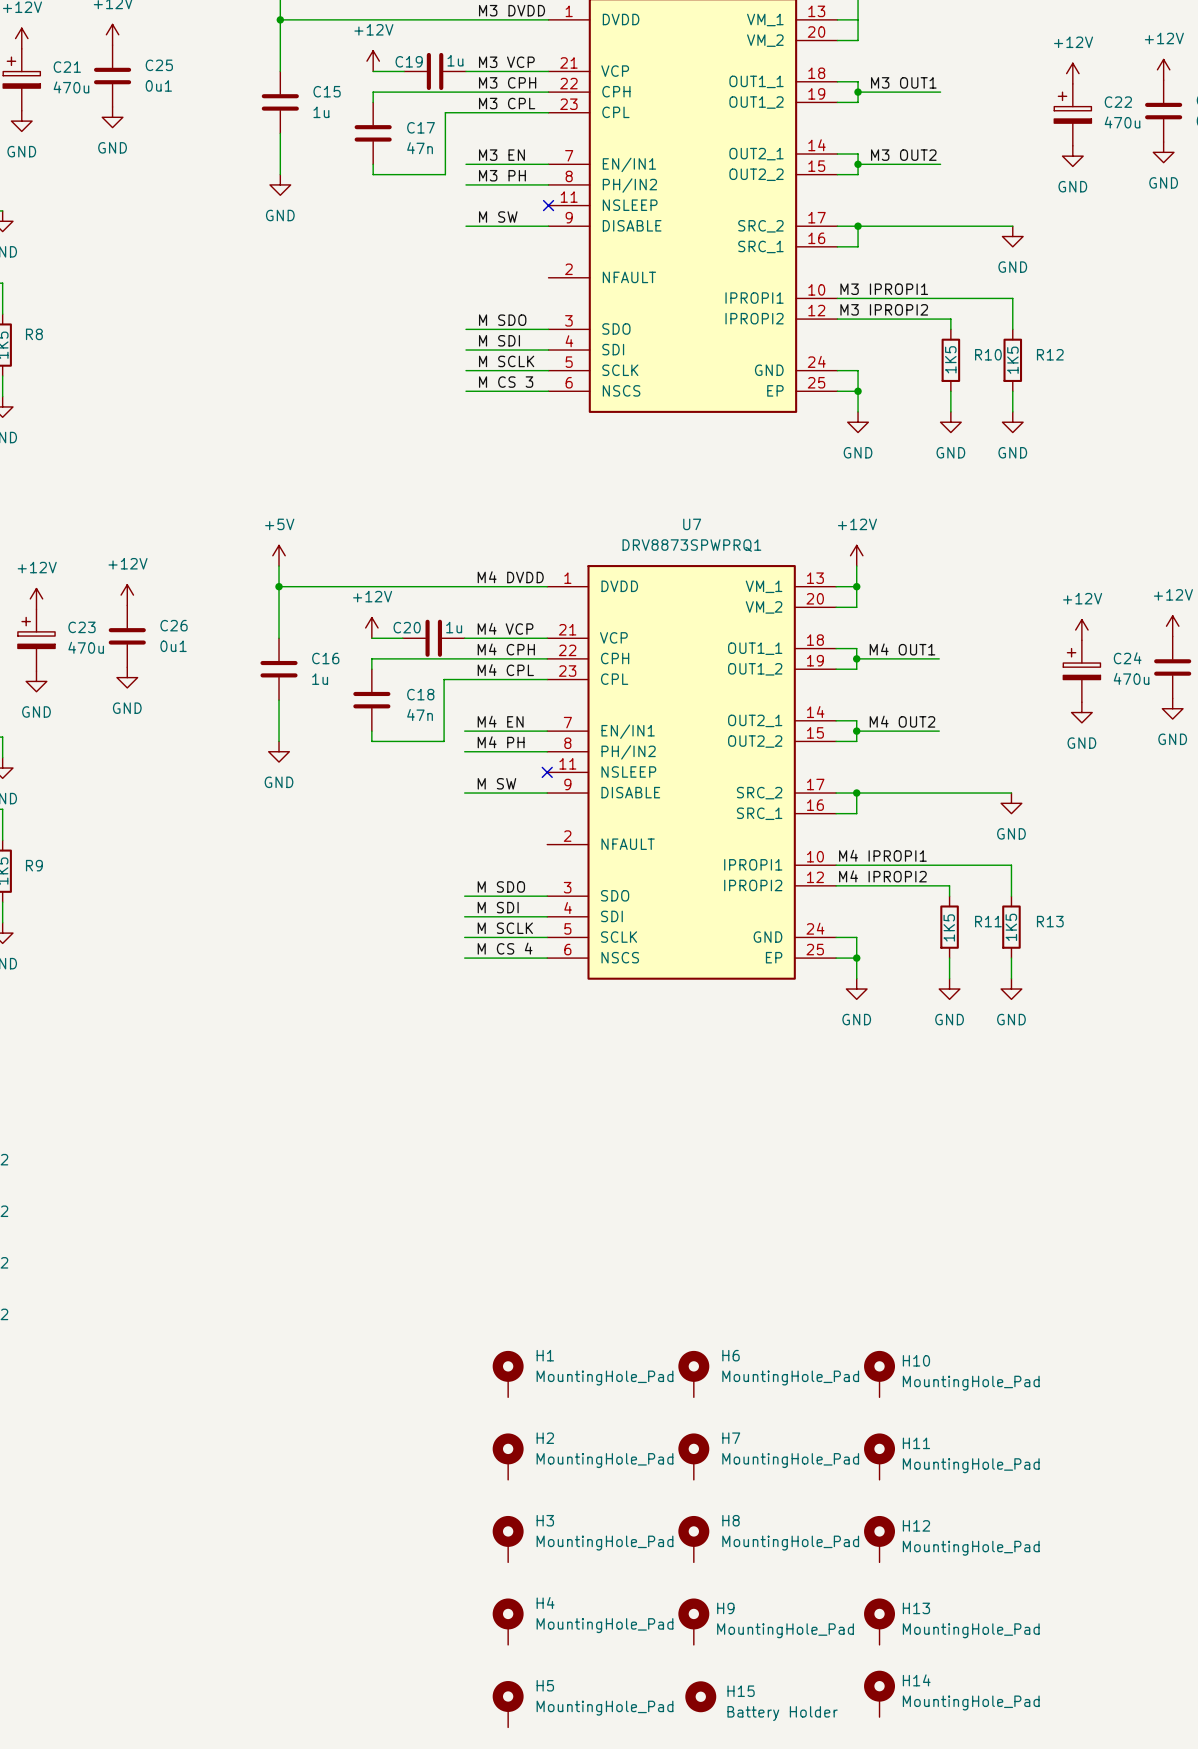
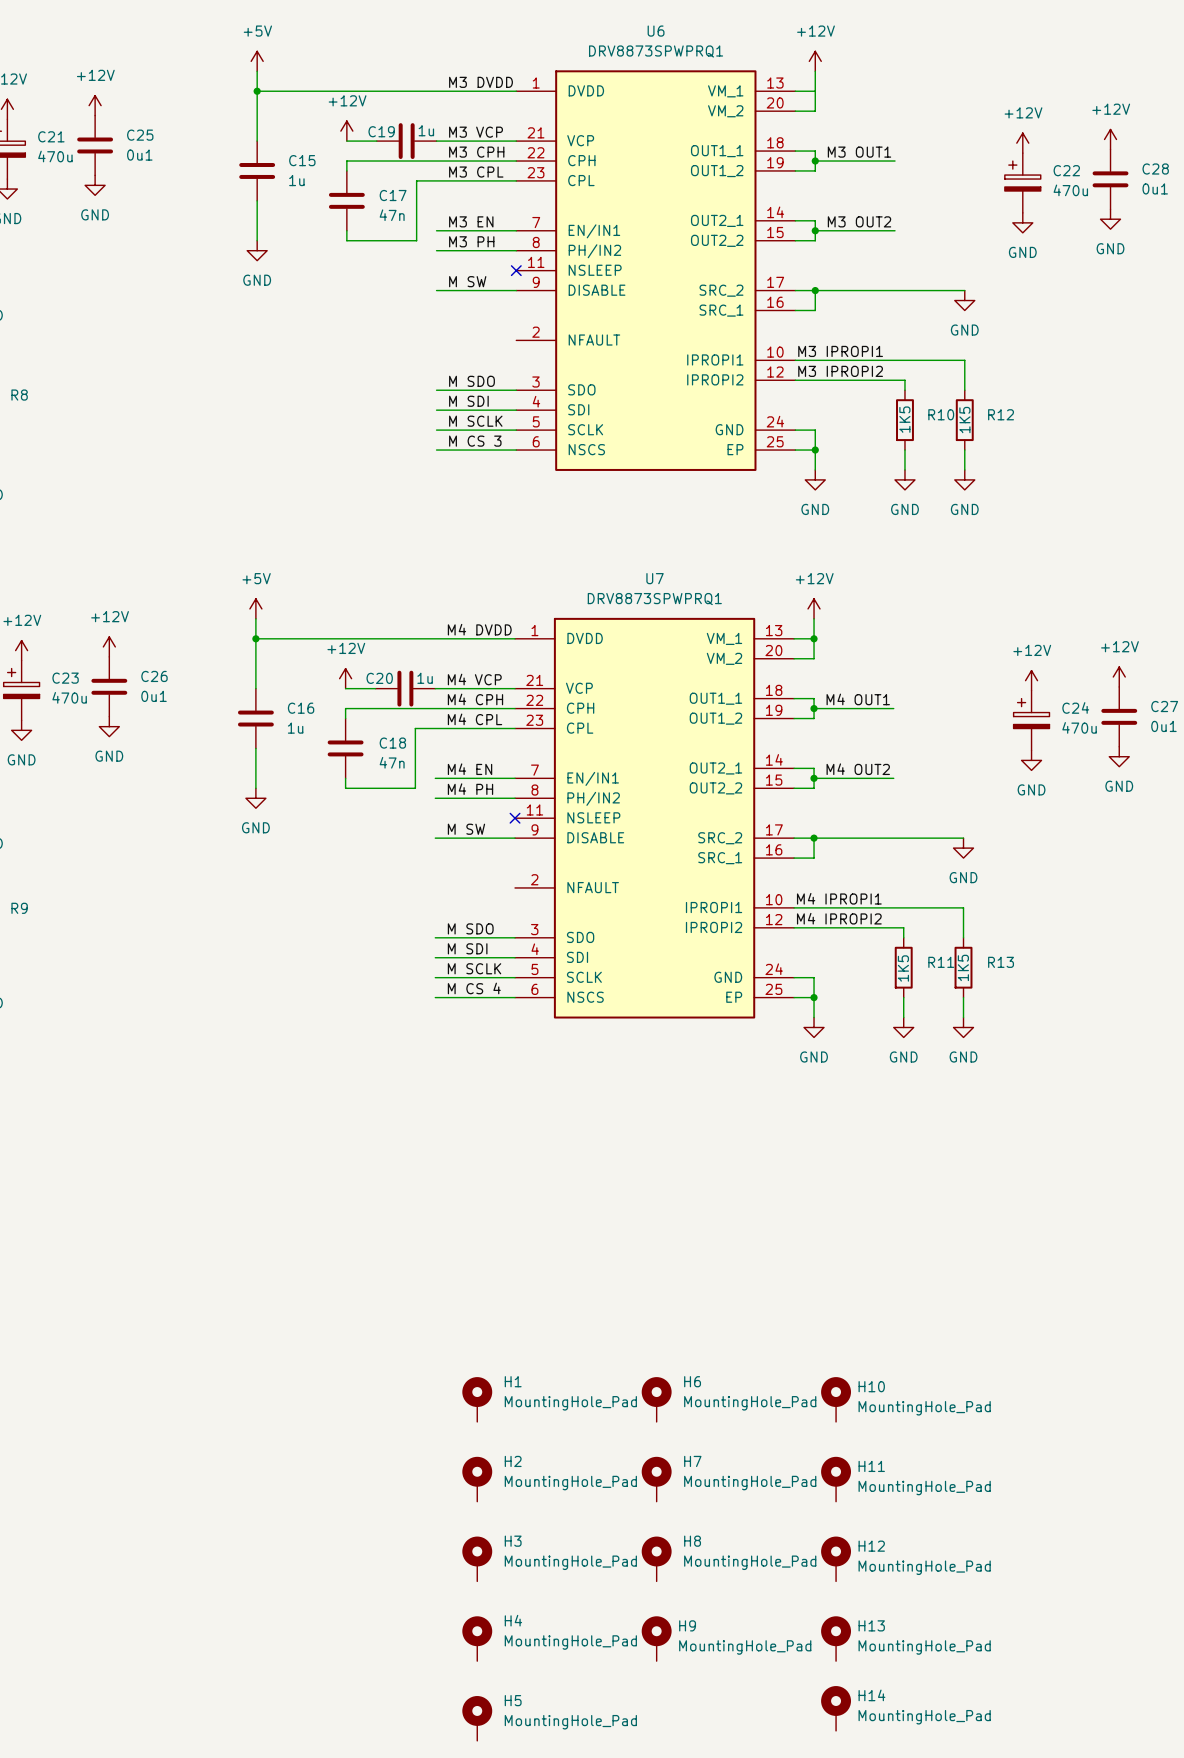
H15: Battery Holder (700, 1696) -> none

